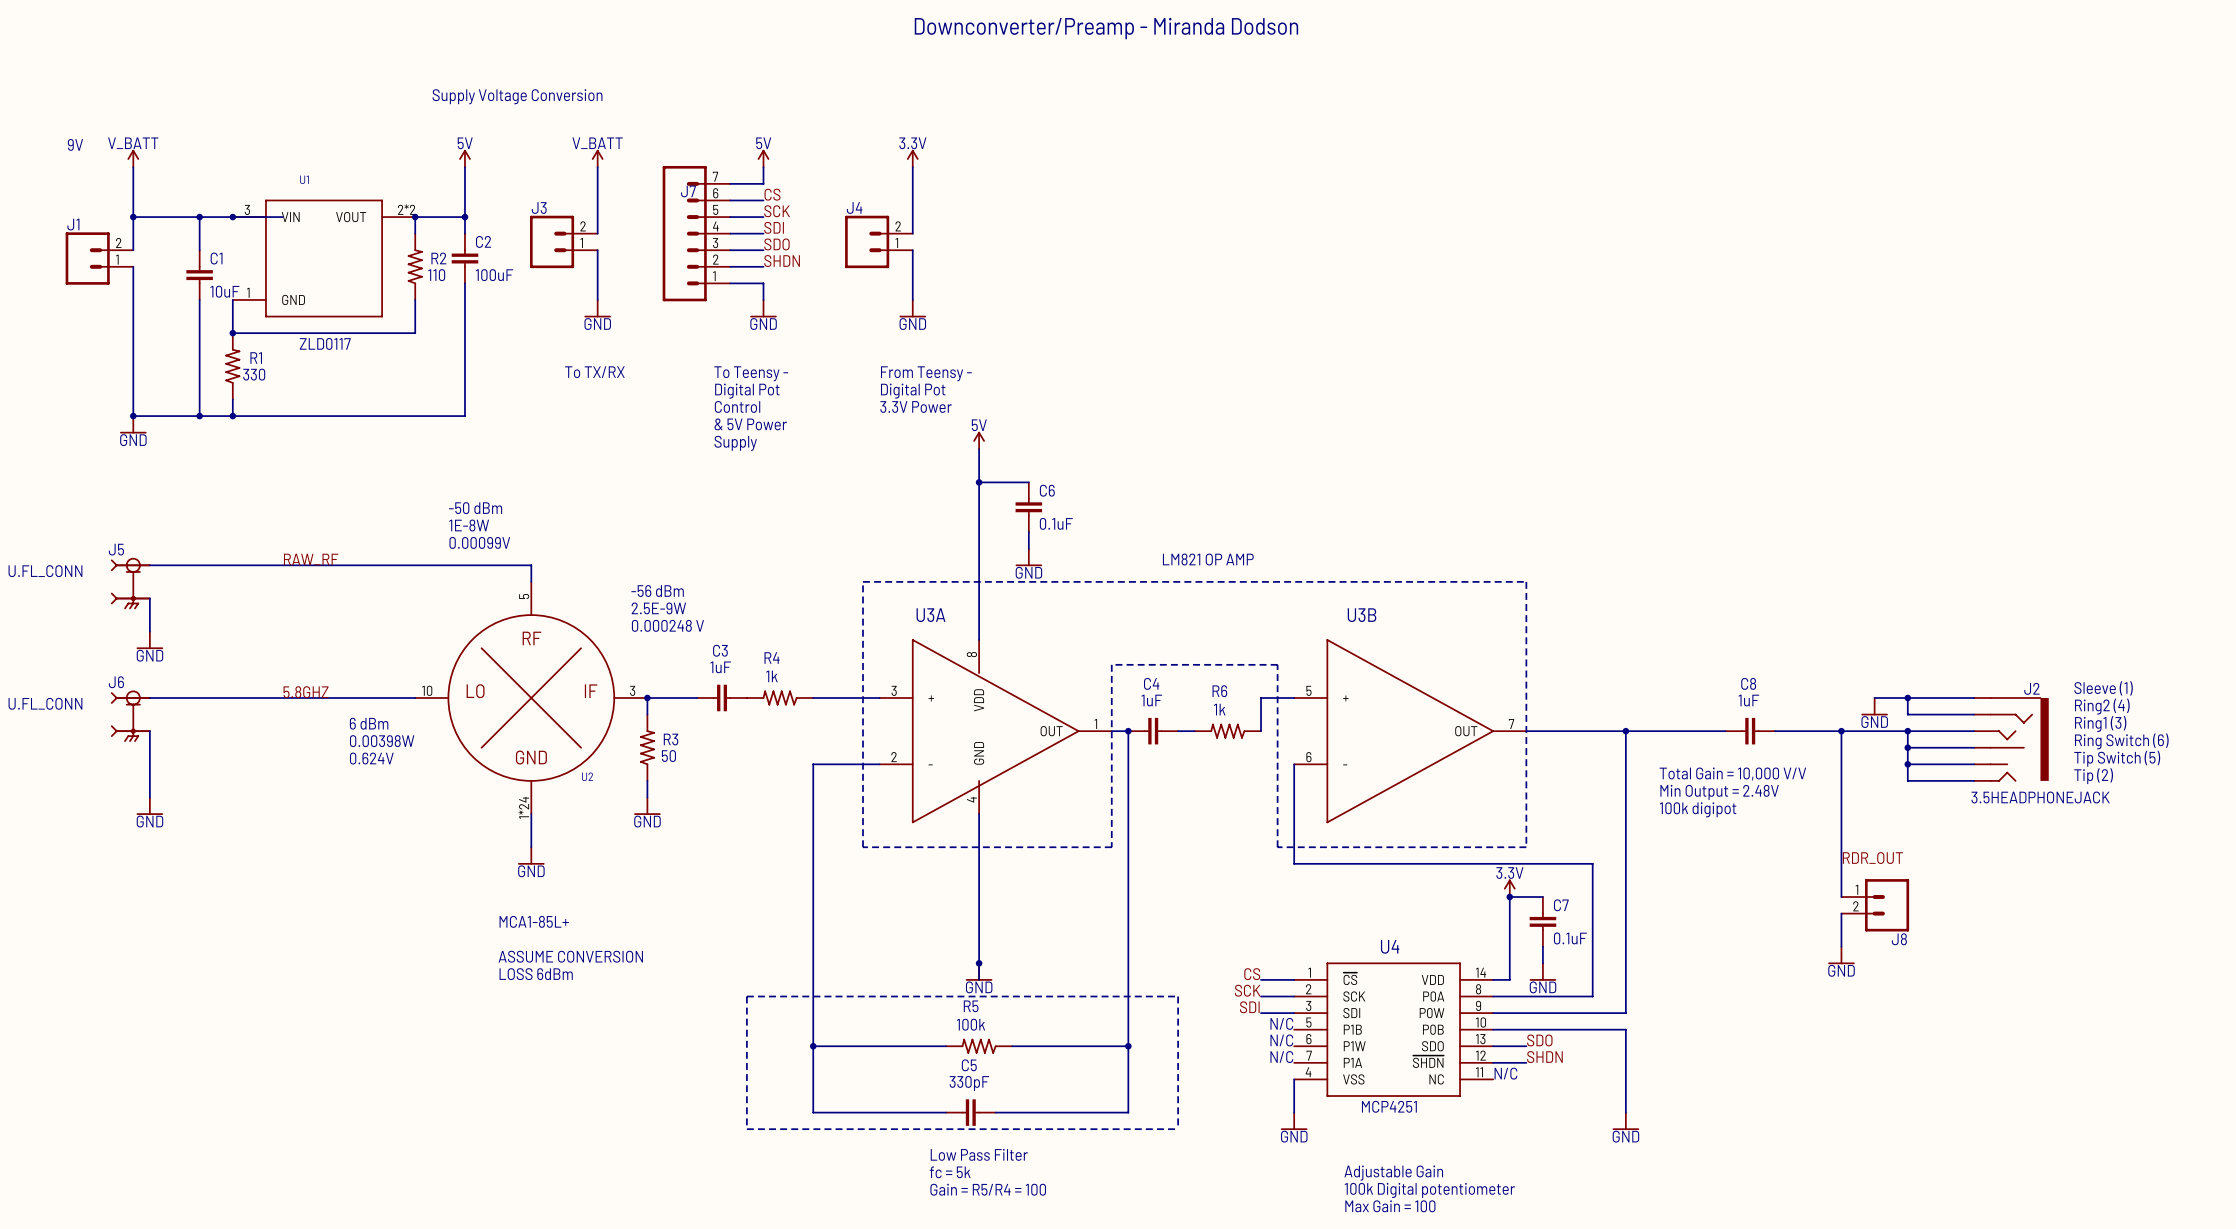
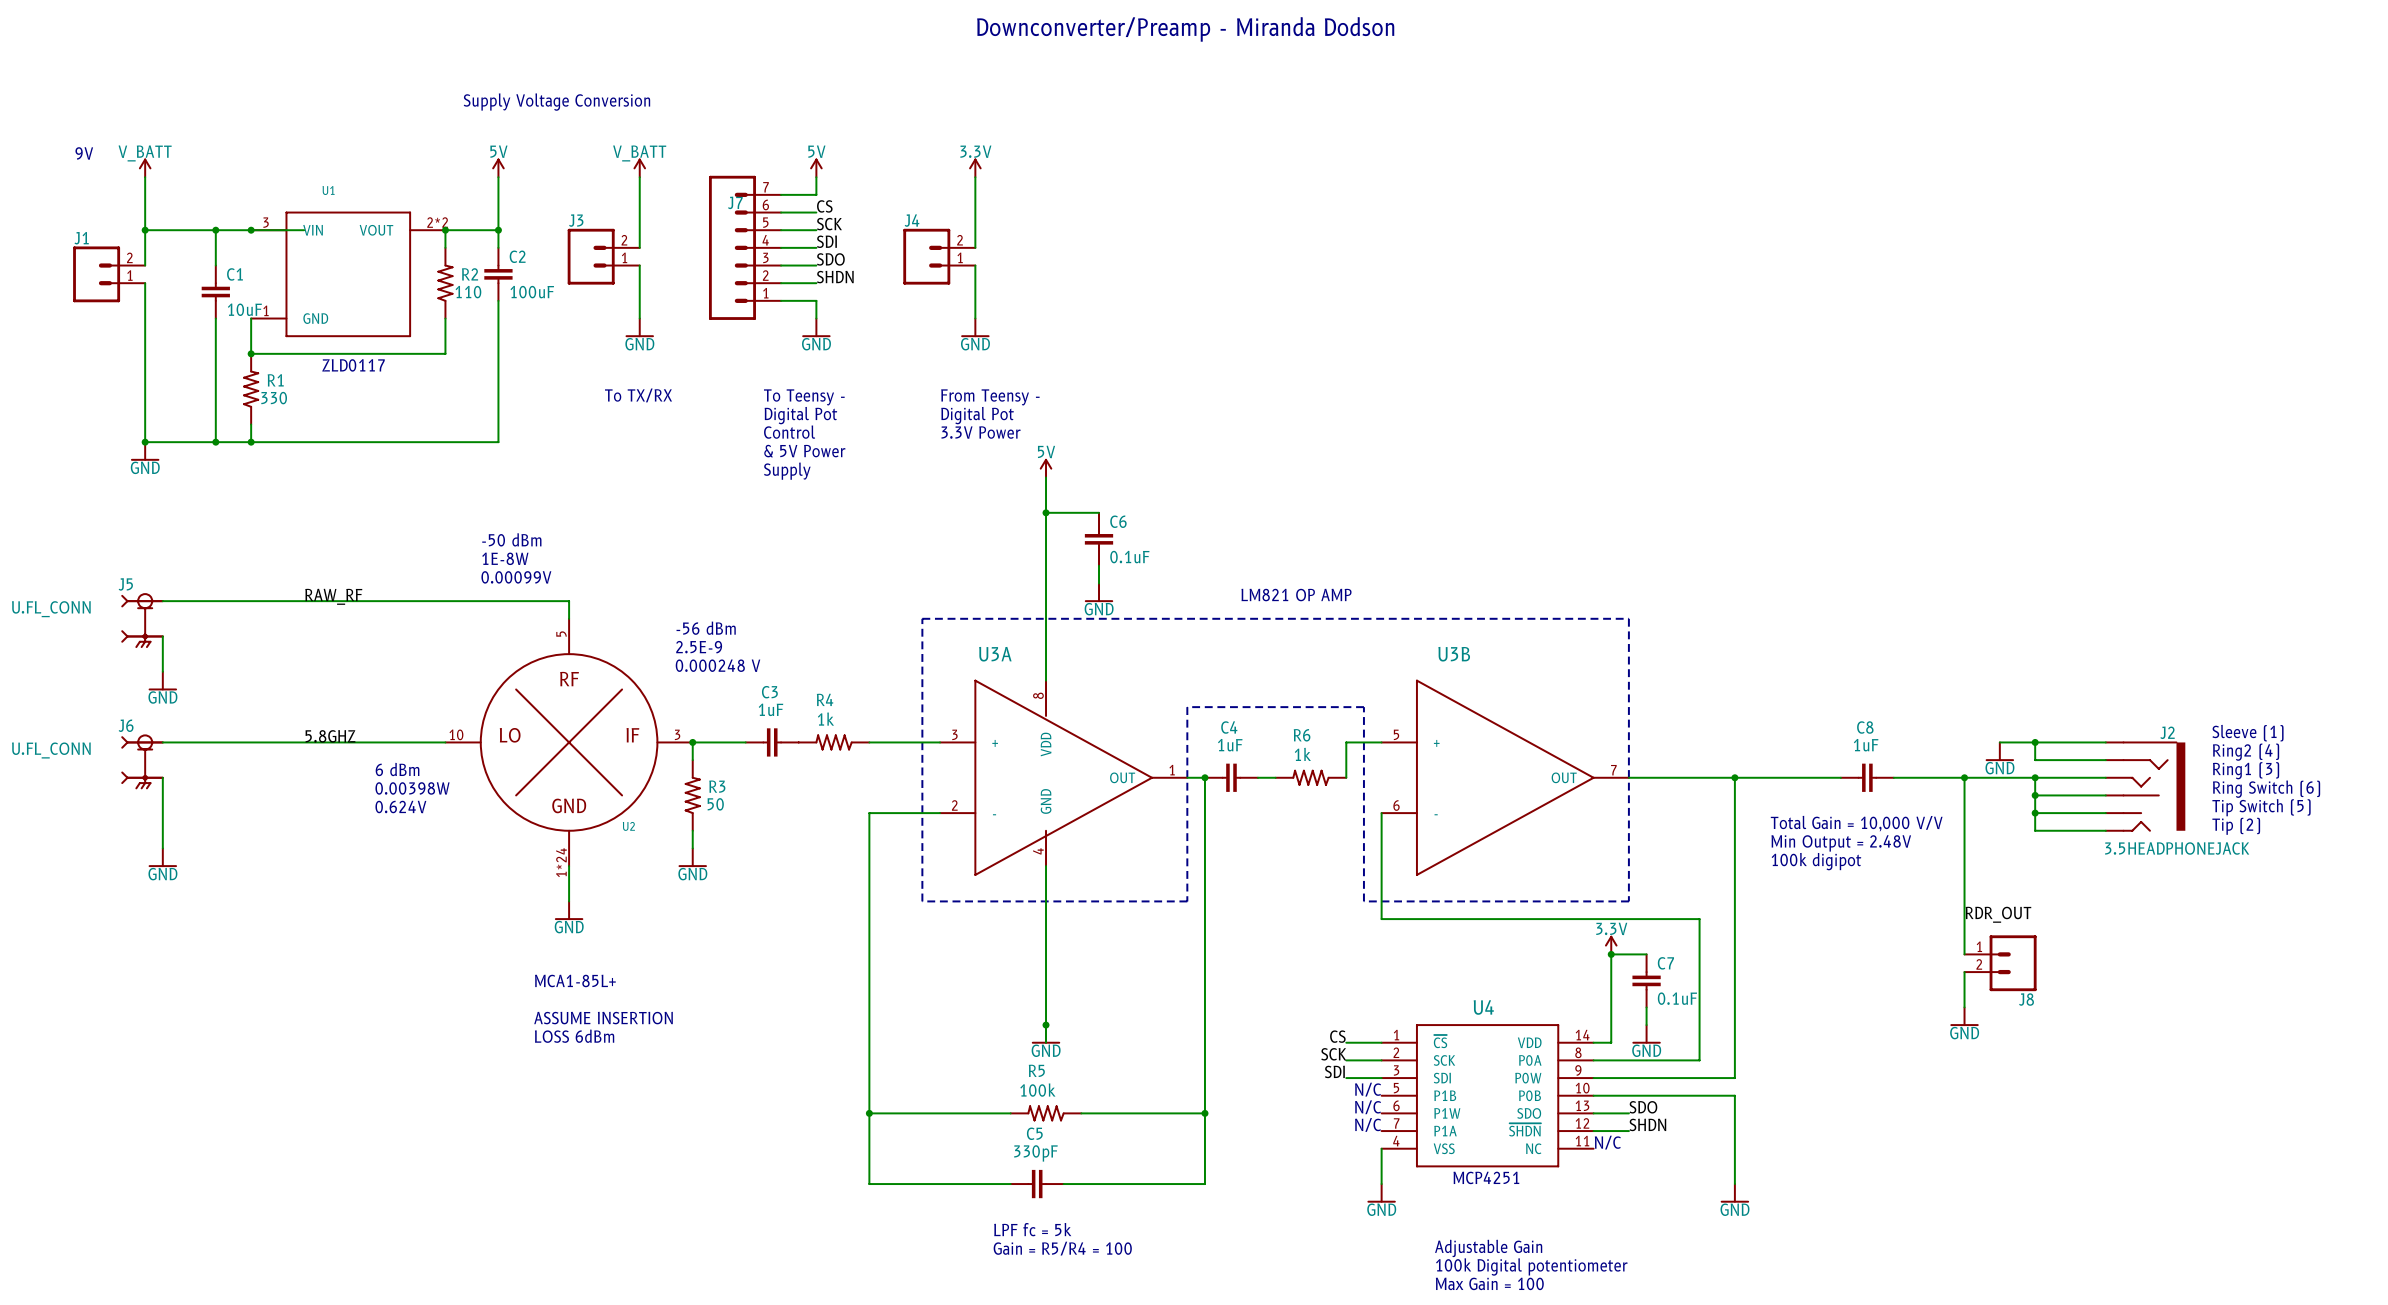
text: 2.5E-9W (658, 608) -> 2.5E-9 (699, 647)
text: ASSUME CONVERSION (570, 956) -> ASSUME INSERTION (603, 1018)
line: (746, 996) (1178, 996) (1178, 1129) (746, 1129) (746, 996) -> none
text: Low Pass Filter (979, 1154) -> LPF fc = 5k (1032, 1229)
text: fc = 5k (950, 1172) -> Gain = R5/R4 = 100 (1062, 1248)
text: Gain = R5/R4 = 100 (988, 1189) -> none

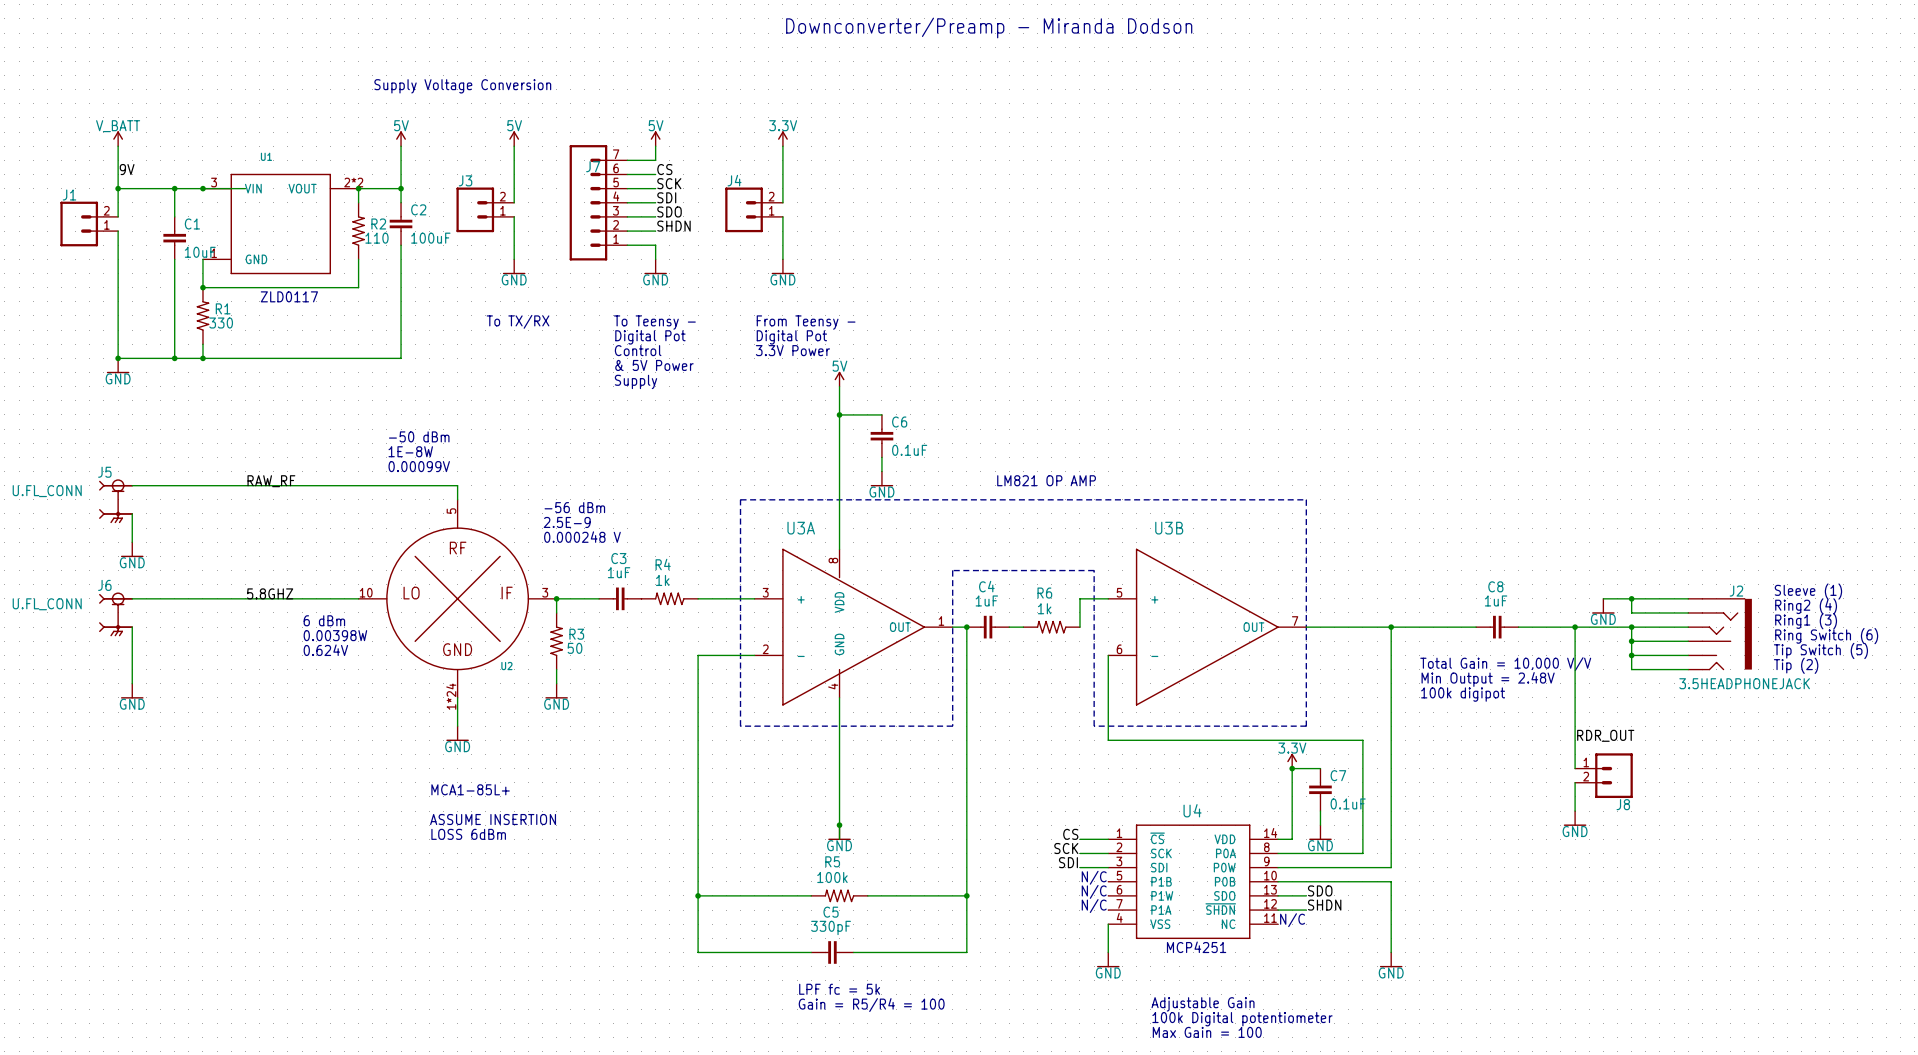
text: 9V (84, 153) -> none
power symbol: V_BATT (639, 167) -> 5V (514, 138)
label: none -> 9V (127, 169)

